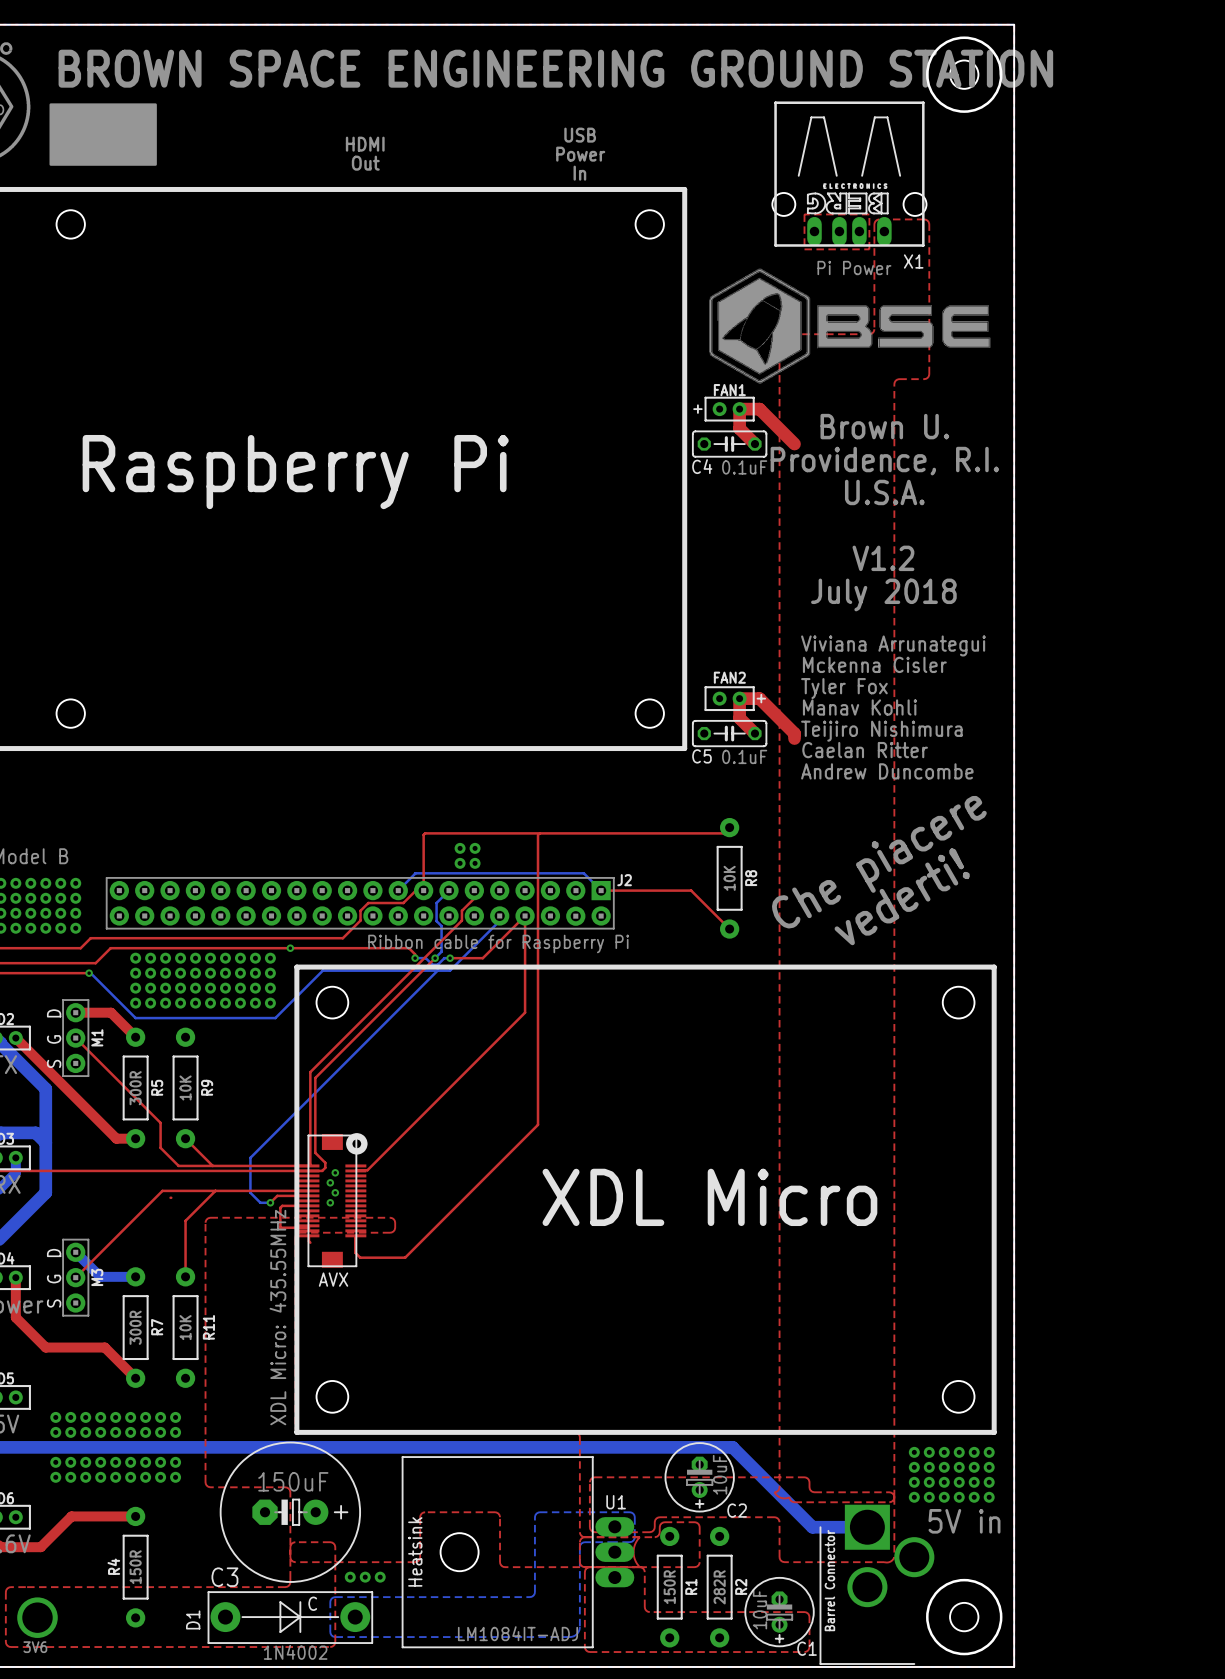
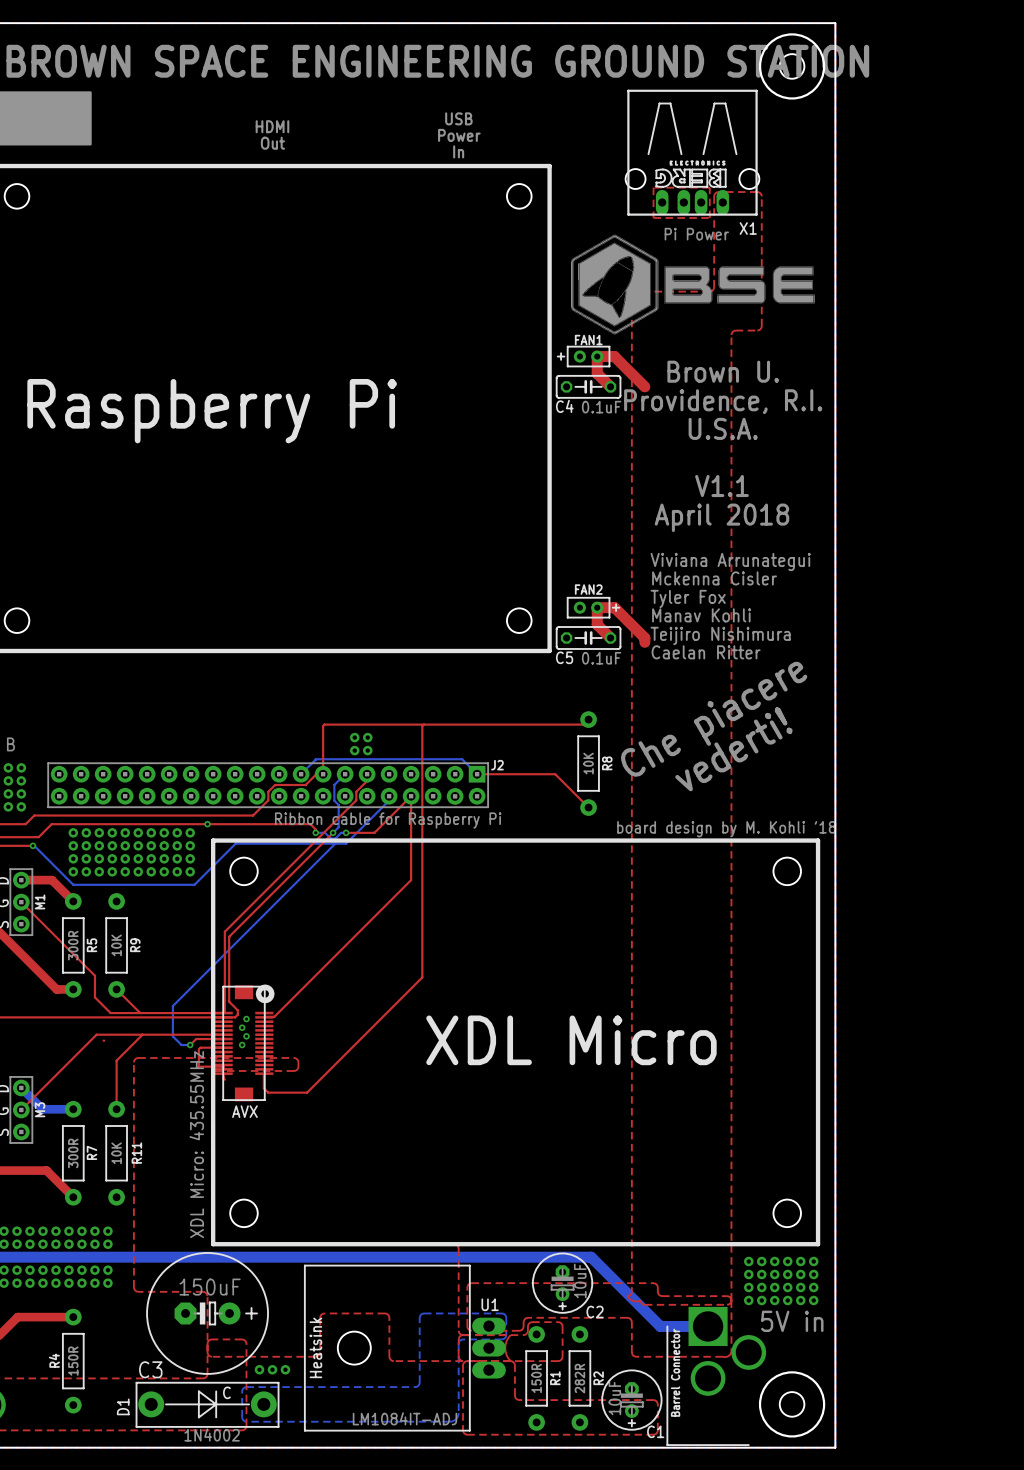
text: V1.2 (883, 558) -> V1.1 (721, 486)
text: July 2018 (883, 594) -> April 2018 (721, 517)
text: Andrew Duncombe (887, 771) -> none
text position: Che piacere (879, 862) -> Che piacere (714, 719)
text position: vederti! (902, 896) -> vederti! (733, 749)
text: none -> board design by M. Kohli '18 (726, 829)

